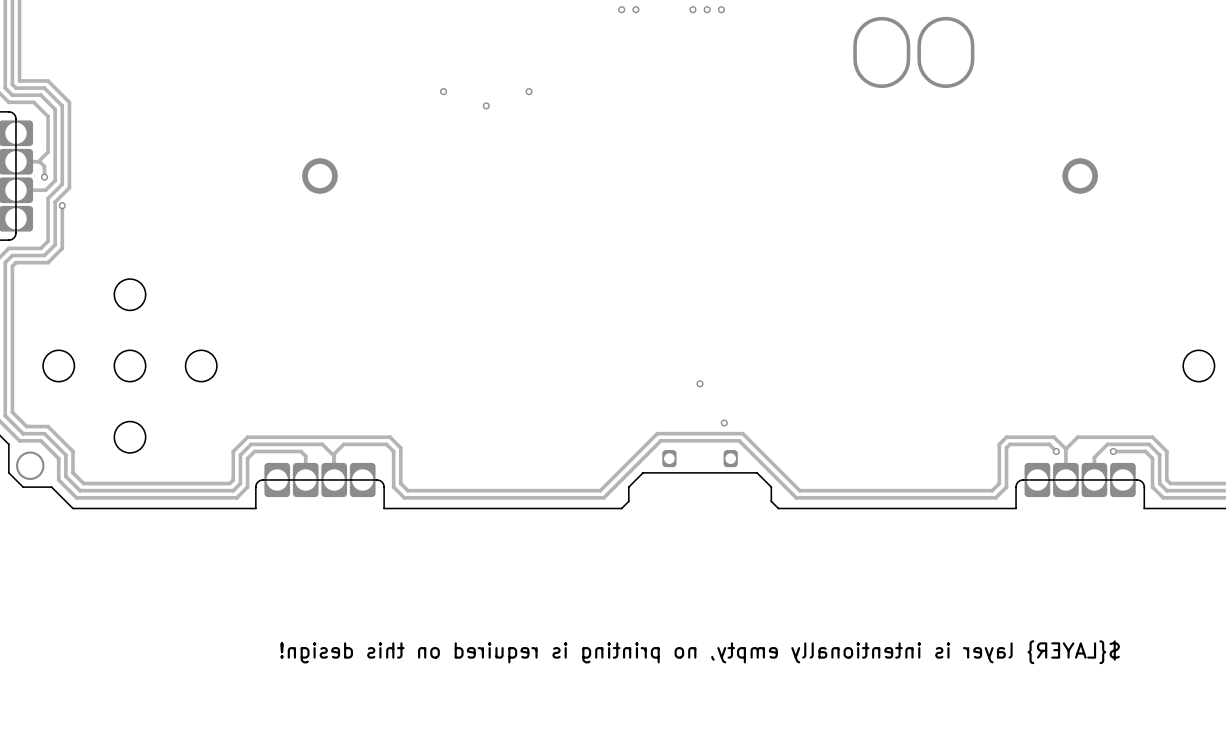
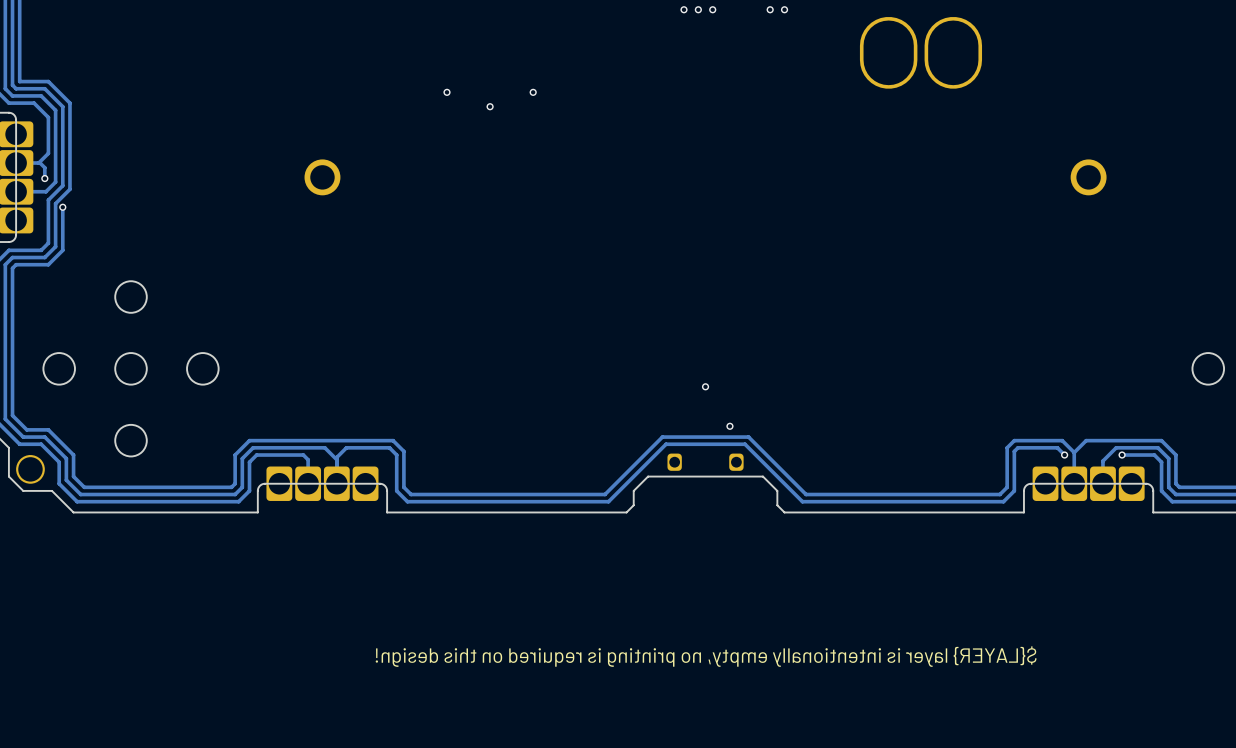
via: (621, 9) -> none
via: (635, 9) -> none
via: none -> (683, 9)
via: (721, 9) -> none
via: none -> (770, 9)
via: none -> (784, 9)

